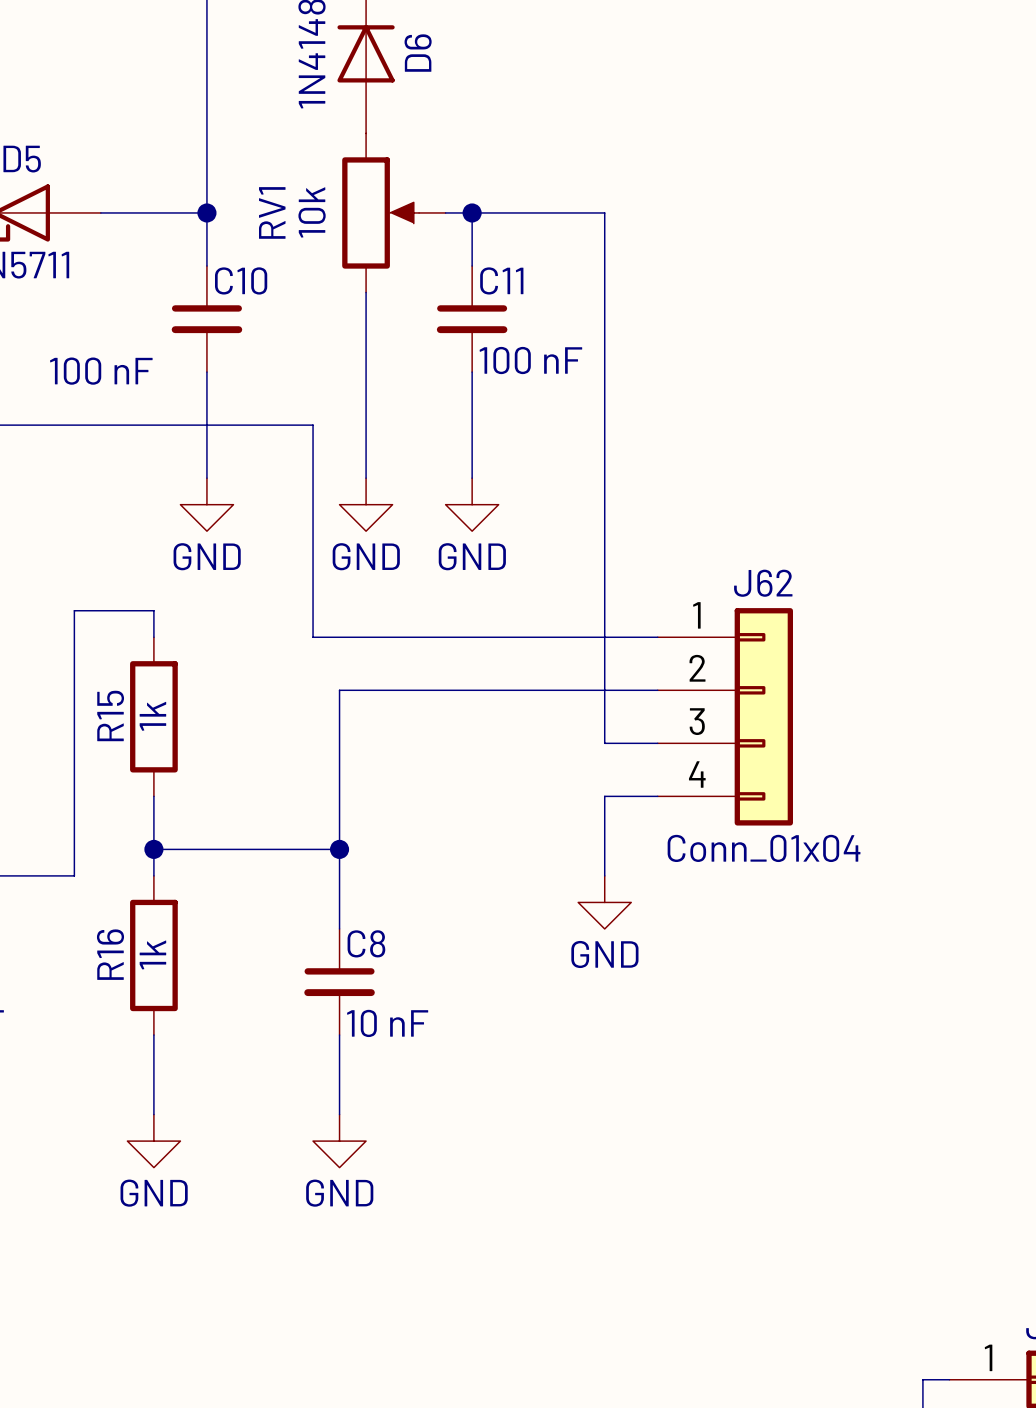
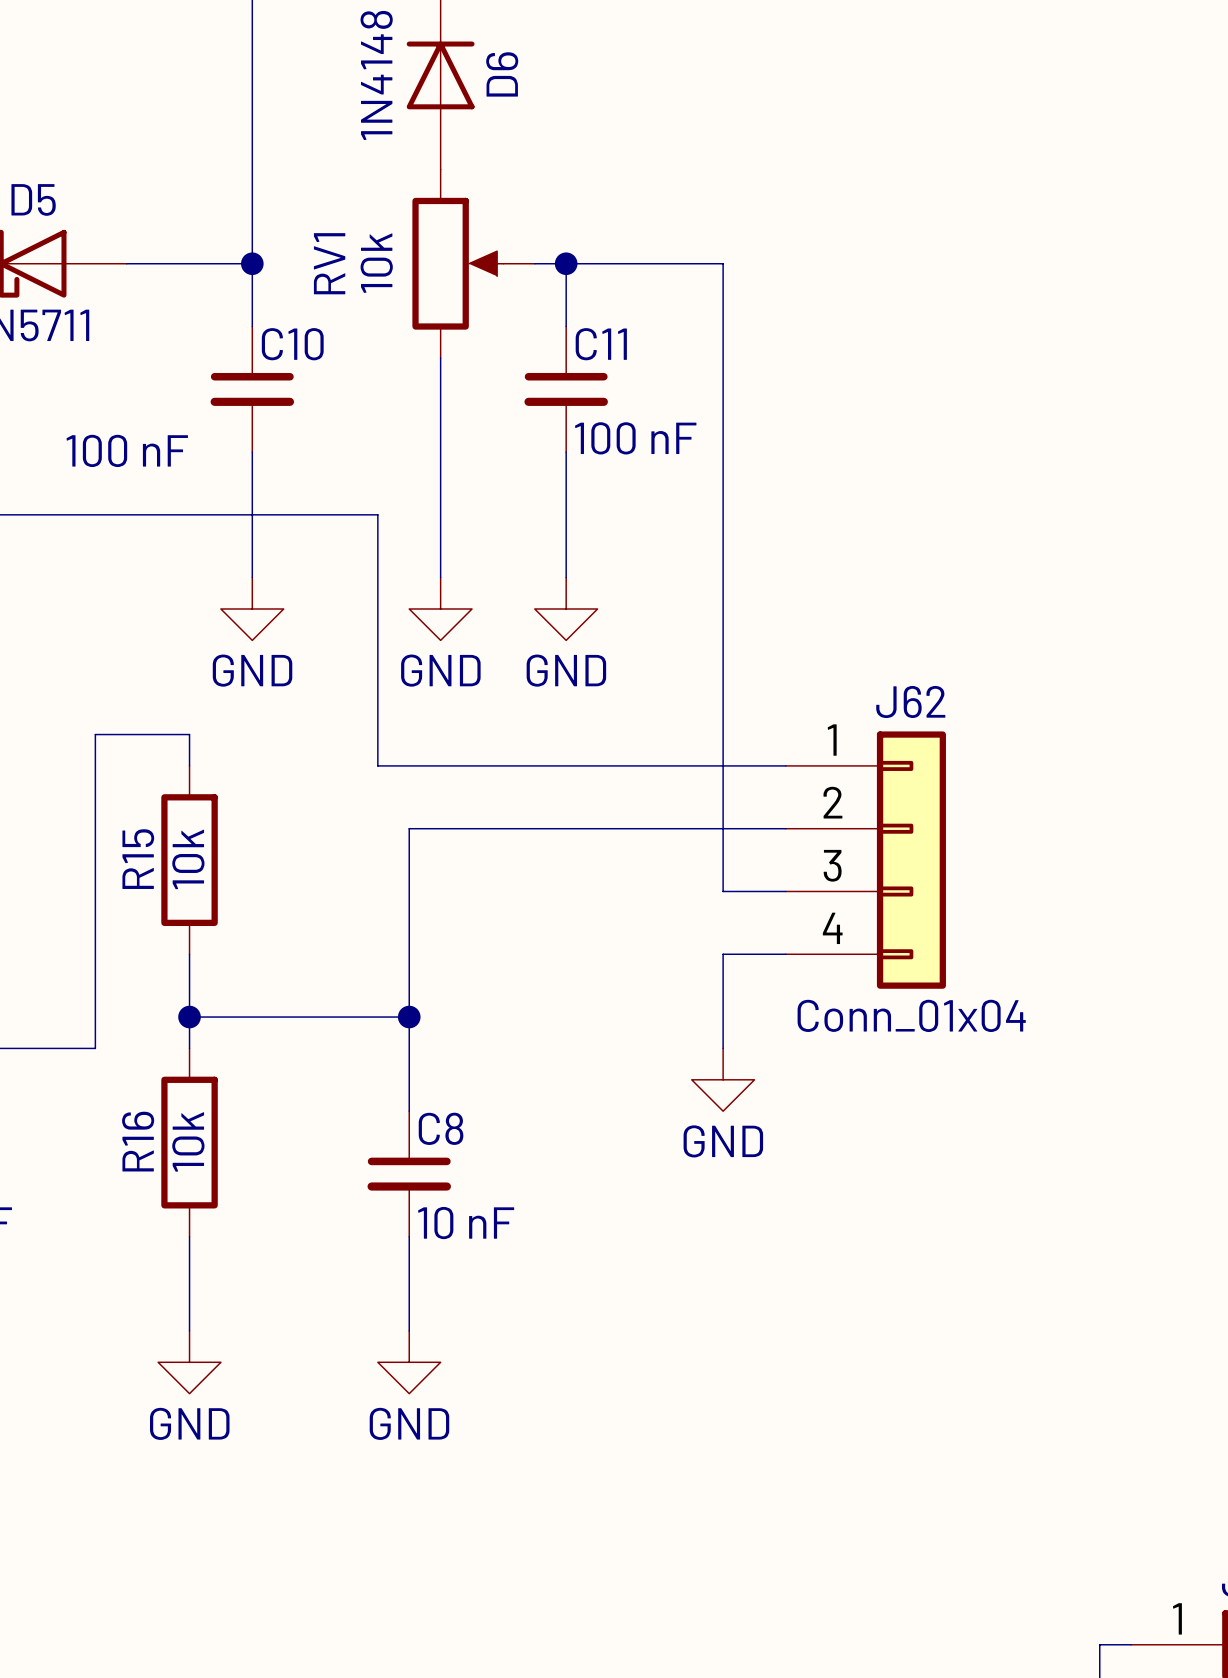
R15 value: 1k (152, 716) -> 10k (188, 859)
R16 value: 1k (152, 954) -> 10k (188, 1141)

